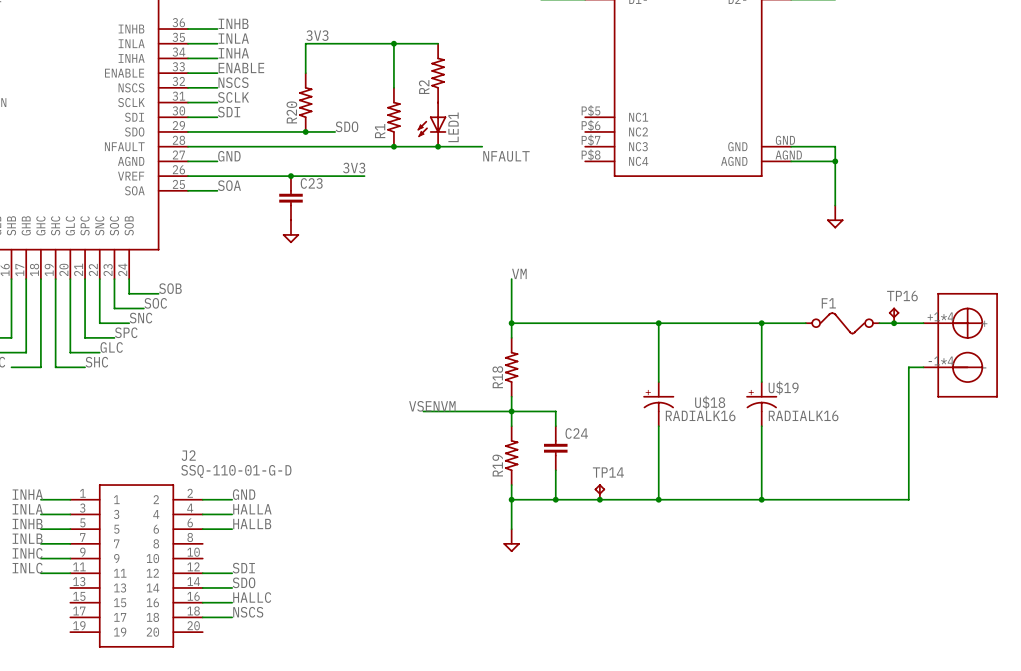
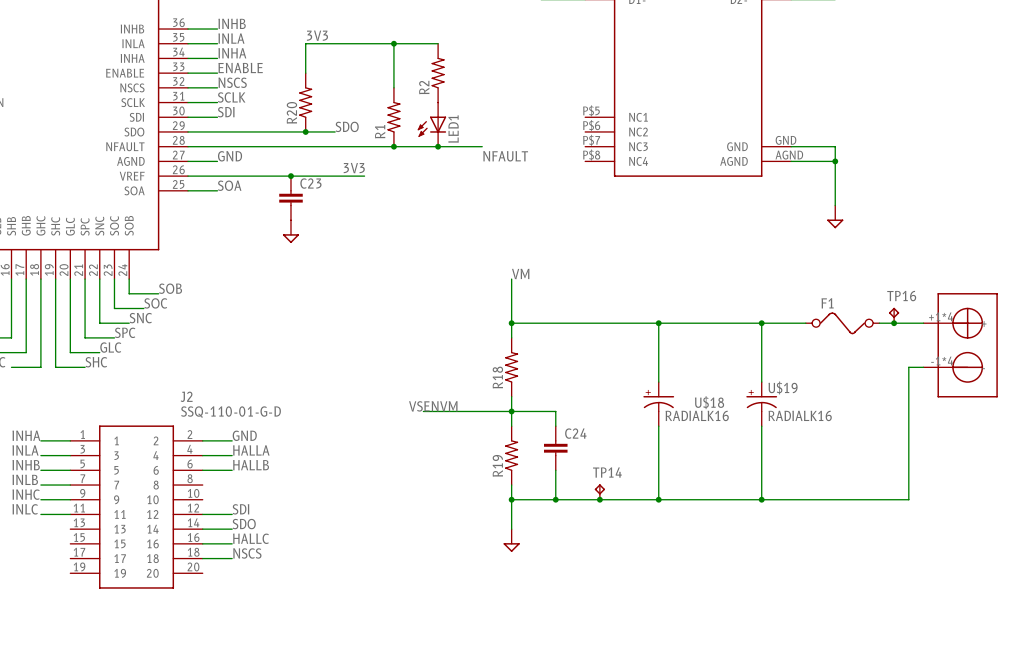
label: none -> INHA (26, 435)
label: none -> INLA (25, 450)
label: none -> HALLA (251, 450)
label: none -> HALLB (251, 465)
label: INHA (27, 494) -> INHC (26, 494)
label position: GND (244, 494) -> GND (244, 435)
wire: (202, 499) (232, 499) -> (202, 440) (232, 440)
label: INLA (27, 509) -> INLC (25, 509)
label: HALLA (252, 509) -> SDI (240, 509)
label position: INHB (27, 524) -> INHB (26, 465)
label: HALLB (252, 524) -> SDO (244, 524)
wire: (40, 529) (70, 529) -> (40, 470) (70, 470)
label position: INLB (27, 538) -> INLB (25, 479)
wire: (40, 543) (70, 543) -> (40, 485) (70, 485)
label: INHC (27, 553) -> none
wire: (40, 558) (70, 558) -> (40, 455) (70, 455)
J2 position: (136, 565) -> (136, 507)
label: INLC (27, 568) -> none
label: SDI (243, 568) -> none
wire: (40, 573) (70, 573) -> (40, 440) (70, 440)
wire: (202, 573) (232, 573) -> (202, 470) (232, 470)
label: SDO (244, 582) -> none
wire: (202, 587) (232, 587) -> (202, 455) (232, 455)
label position: HALLC (252, 597) -> HALLC (250, 538)
wire: (202, 602) (232, 602) -> (202, 543) (232, 543)
label position: NSCS (248, 612) -> NSCS (247, 553)
wire: (202, 617) (232, 617) -> (202, 558) (232, 558)

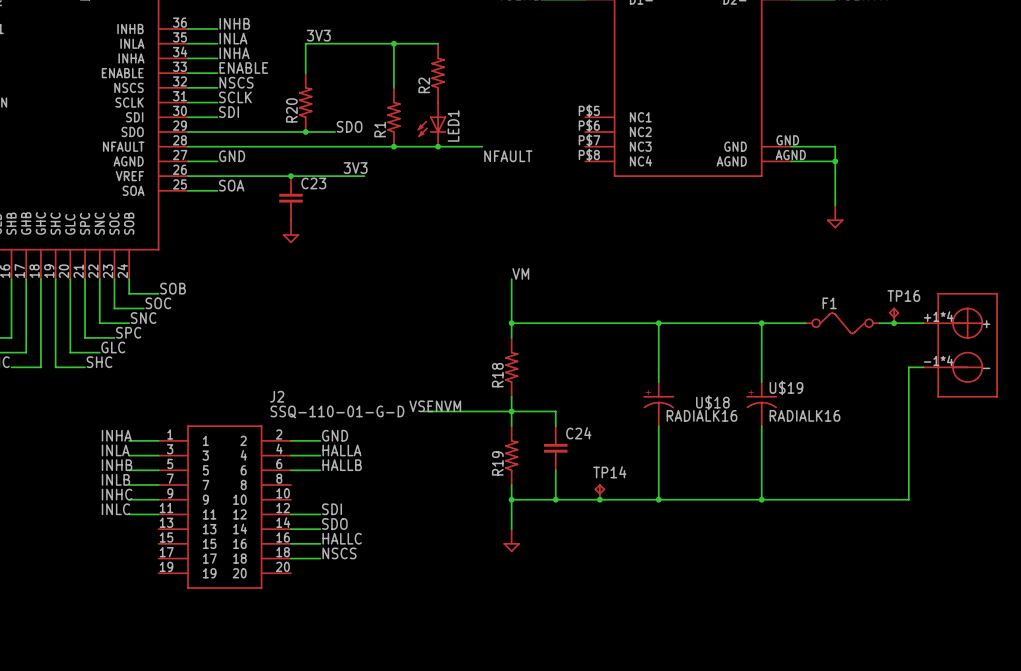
label position: INHA (26, 435) -> INHA (116, 435)
label position: GND (244, 435) -> GND (335, 435)
wire: (40, 440) (70, 440) -> (129, 440) (158, 440)
wire: (202, 440) (232, 440) -> (290, 440) (320, 440)
label position: INLA (25, 450) -> INLA (115, 450)
label position: HALLA (251, 450) -> HALLA (341, 450)
wire: (40, 455) (70, 455) -> (129, 455) (158, 455)
wire: (202, 455) (232, 455) -> (290, 455) (320, 455)
label position: INHB (26, 465) -> INHB (117, 465)
label position: HALLB (251, 465) -> HALLB (342, 465)
wire: (40, 470) (70, 470) -> (129, 470) (158, 470)
wire: (202, 470) (232, 470) -> (290, 470) (320, 470)
label position: INLB (25, 479) -> INLB (115, 479)
wire: (40, 485) (70, 485) -> (129, 485) (158, 485)
label position: INHC (26, 494) -> INHC (117, 494)
wire: (40, 499) (70, 499) -> (129, 499) (158, 499)
J2 position: (136, 507) -> (224, 507)
label position: INLC (25, 509) -> INLC (115, 509)
label position: SDI (240, 509) -> SDI (331, 509)
wire: (40, 514) (70, 514) -> (129, 514) (158, 514)
wire: (202, 514) (232, 514) -> (290, 514) (320, 514)
label position: SDO (244, 524) -> SDO (334, 524)
wire: (202, 529) (232, 529) -> (290, 529) (320, 529)
label position: HALLC (250, 538) -> HALLC (342, 538)
wire: (202, 543) (232, 543) -> (290, 543) (320, 543)
label position: NSCS (247, 553) -> NSCS (339, 553)
wire: (202, 558) (232, 558) -> (290, 558) (320, 558)

